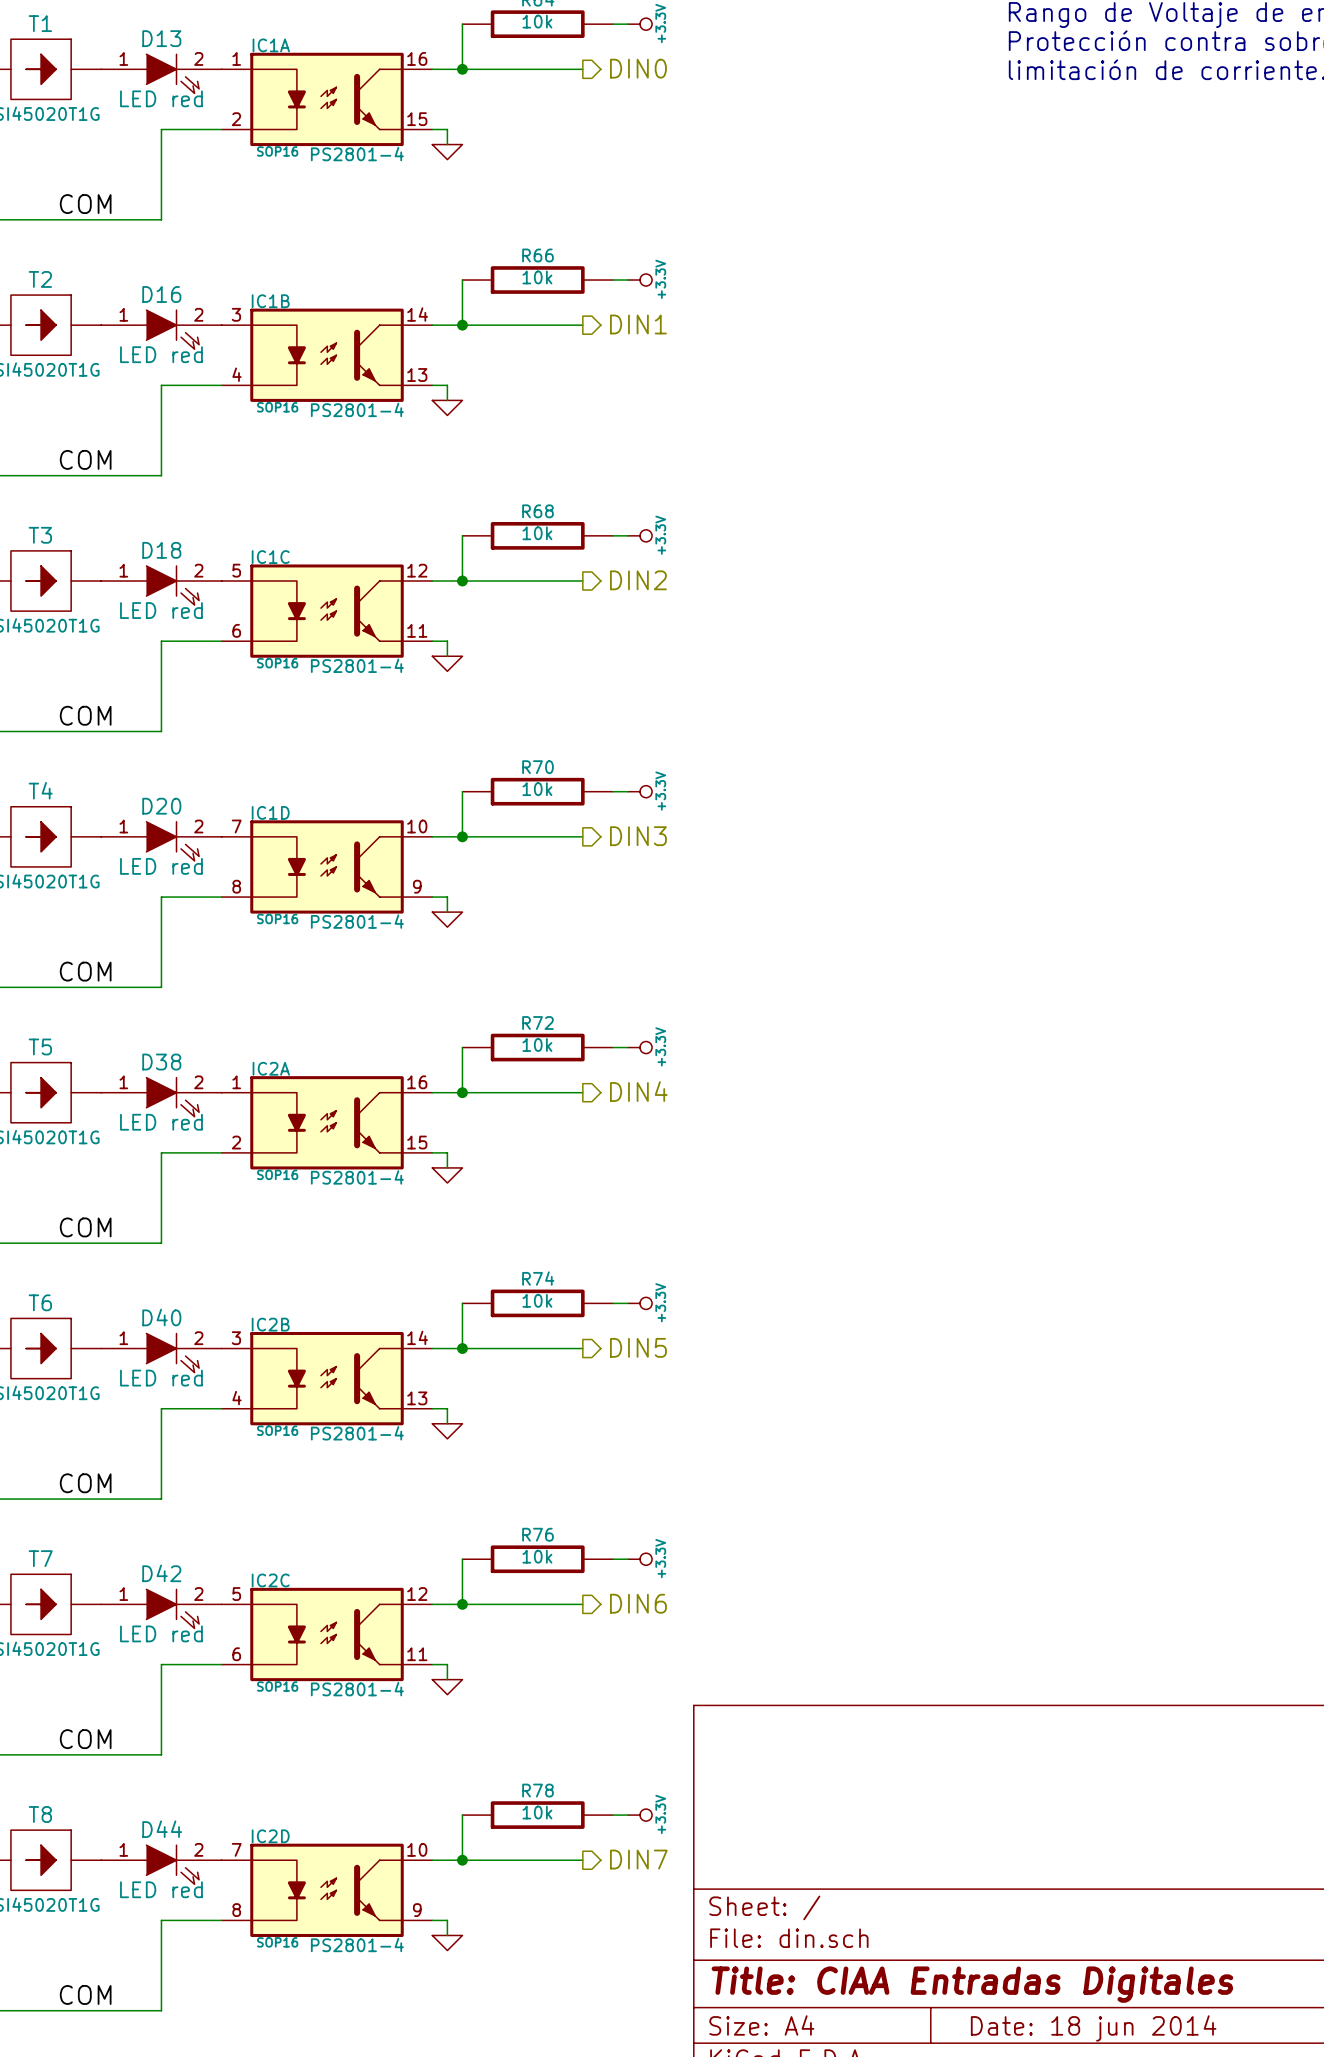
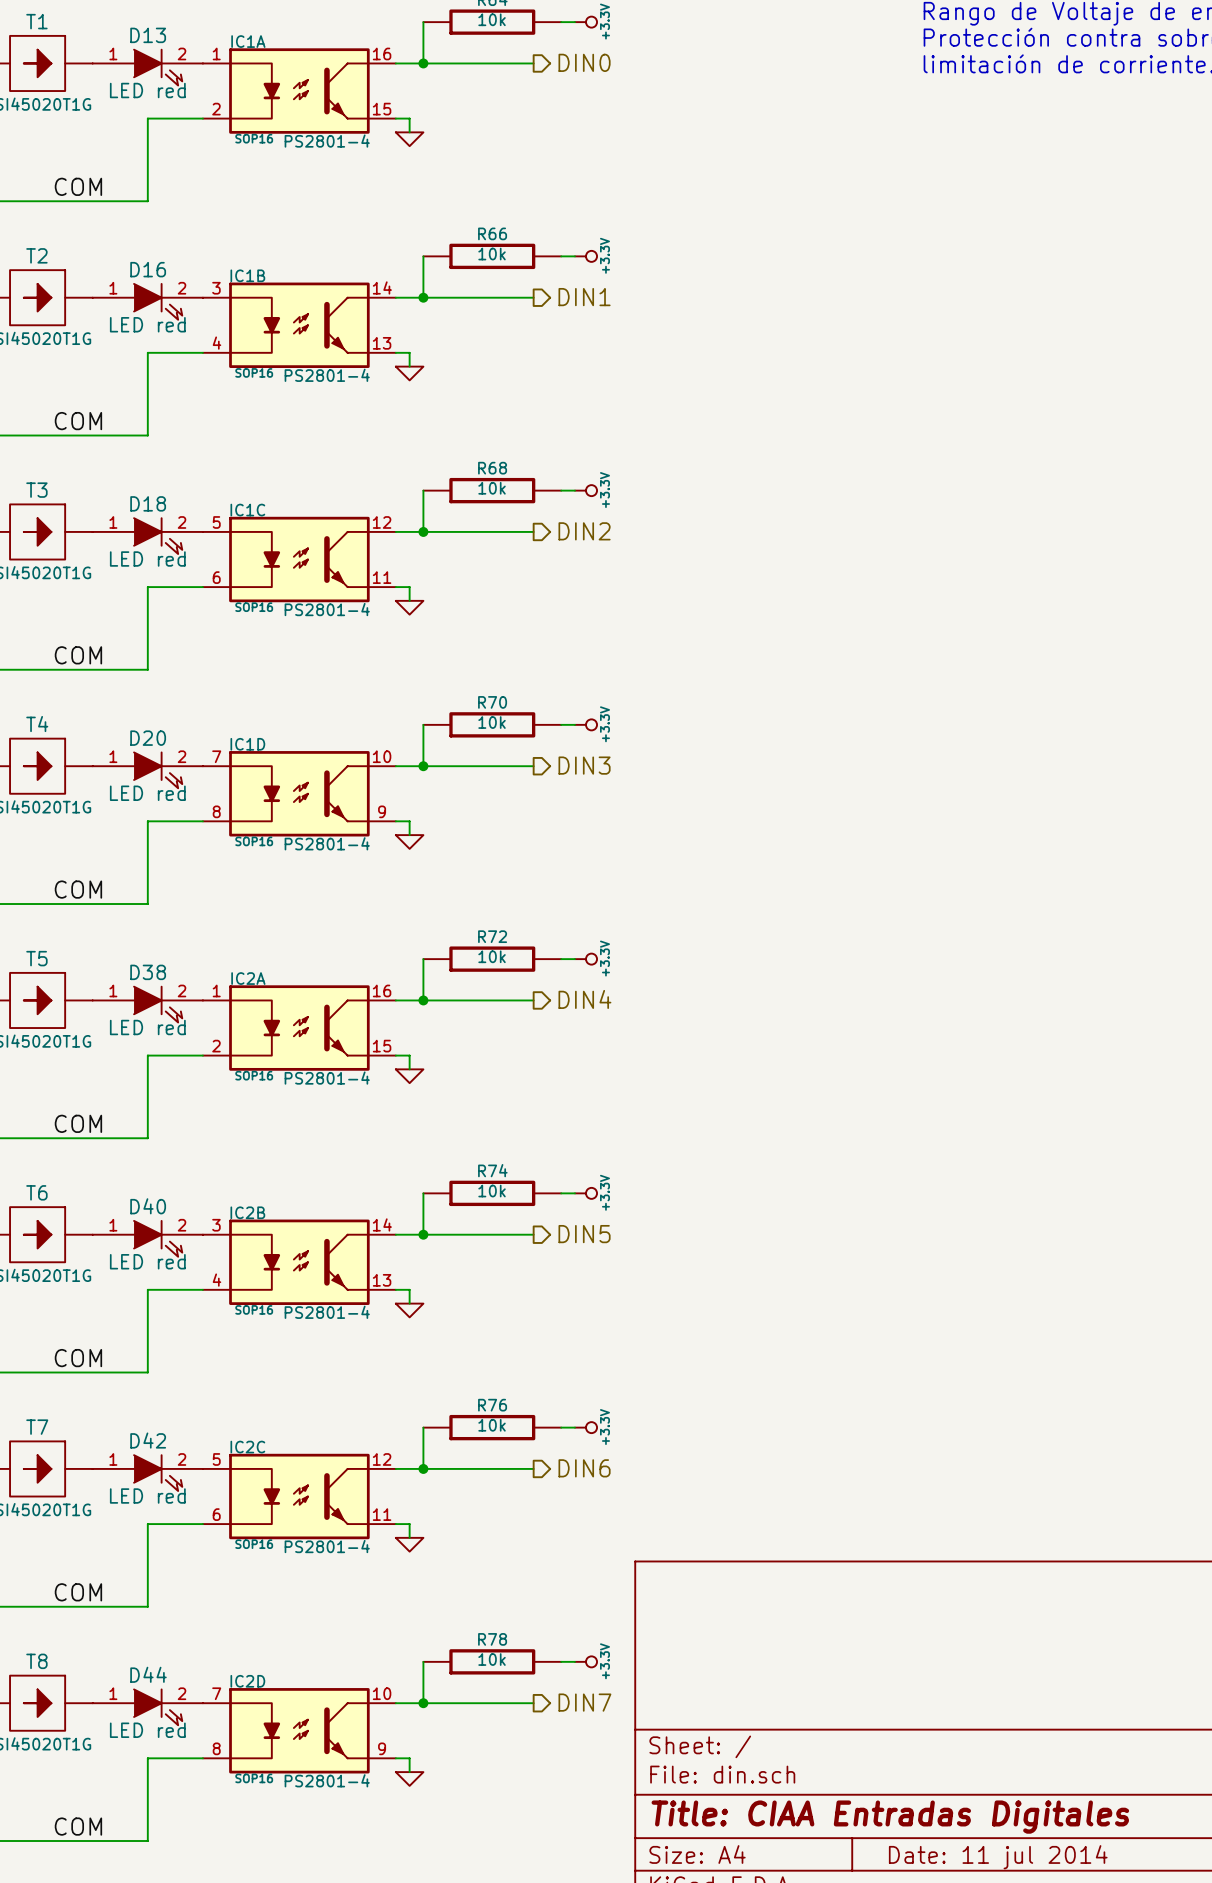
title block: Date: 18 jun 2014 (1093, 2028) -> Date: 11 jul 2014 (998, 1857)

